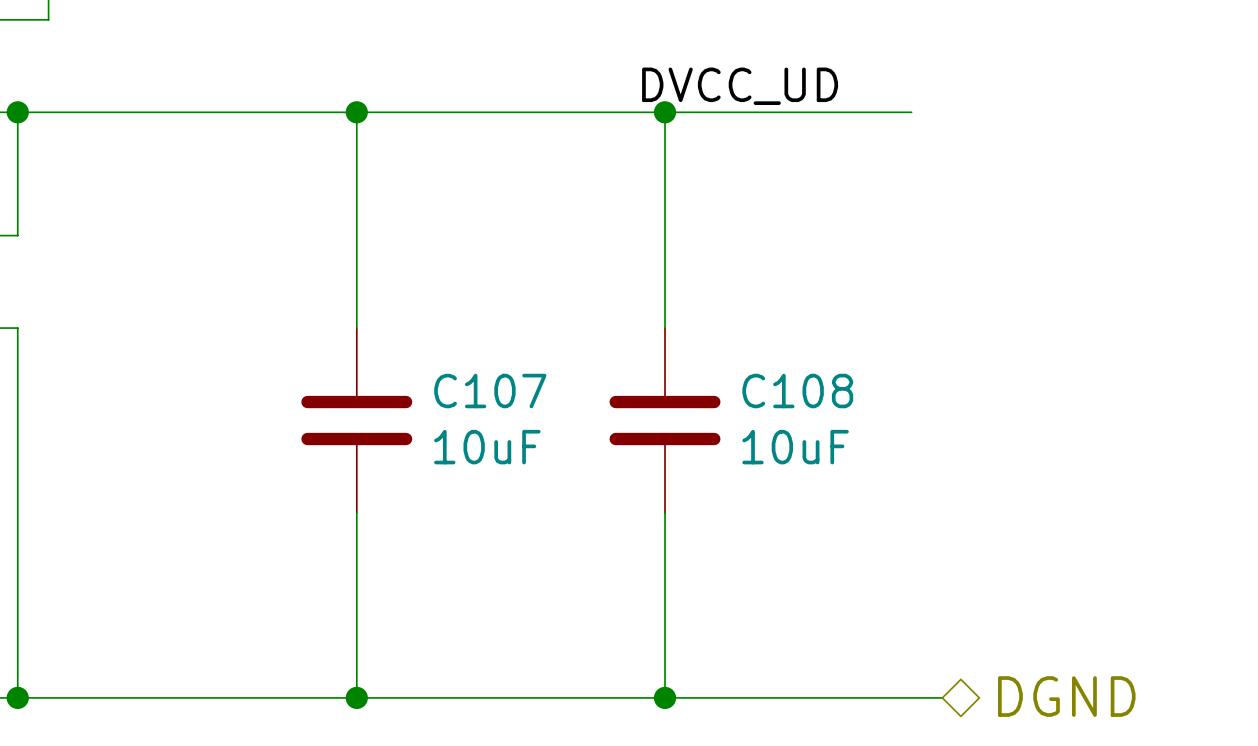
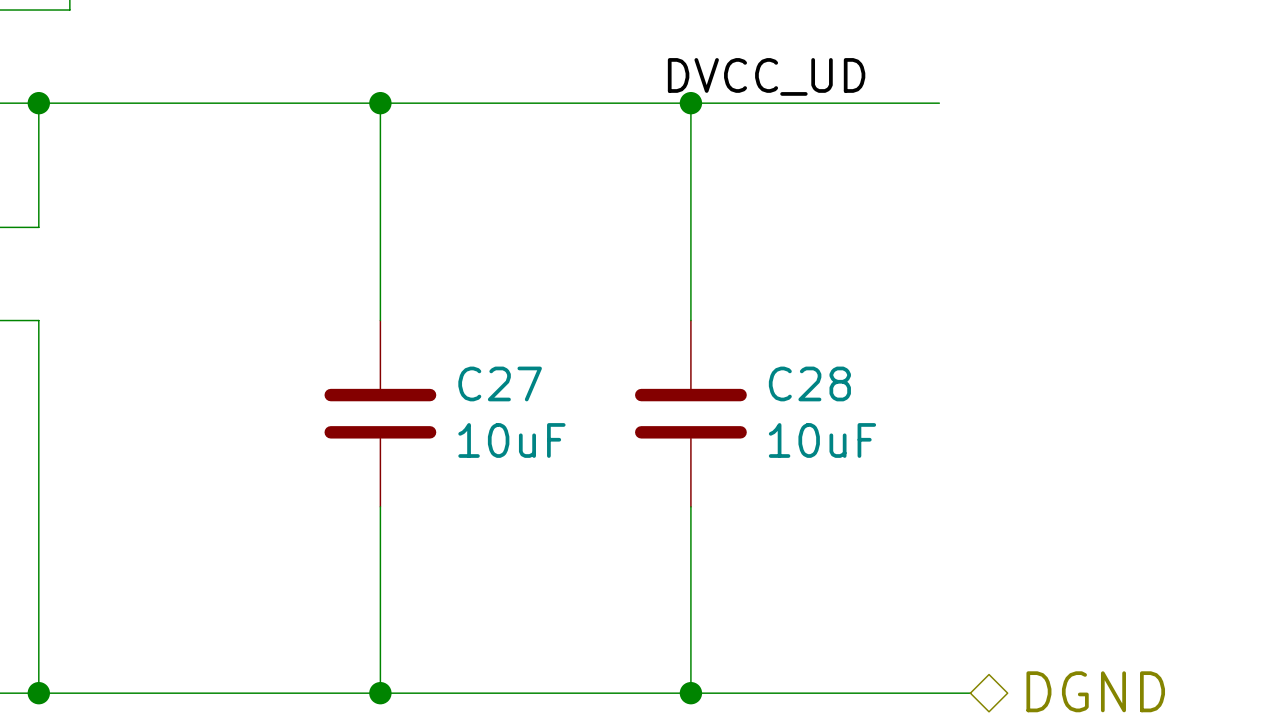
C107 name: C107 (490, 391) -> C27 (500, 383)
C108 name: C108 (797, 391) -> C28 (809, 383)

